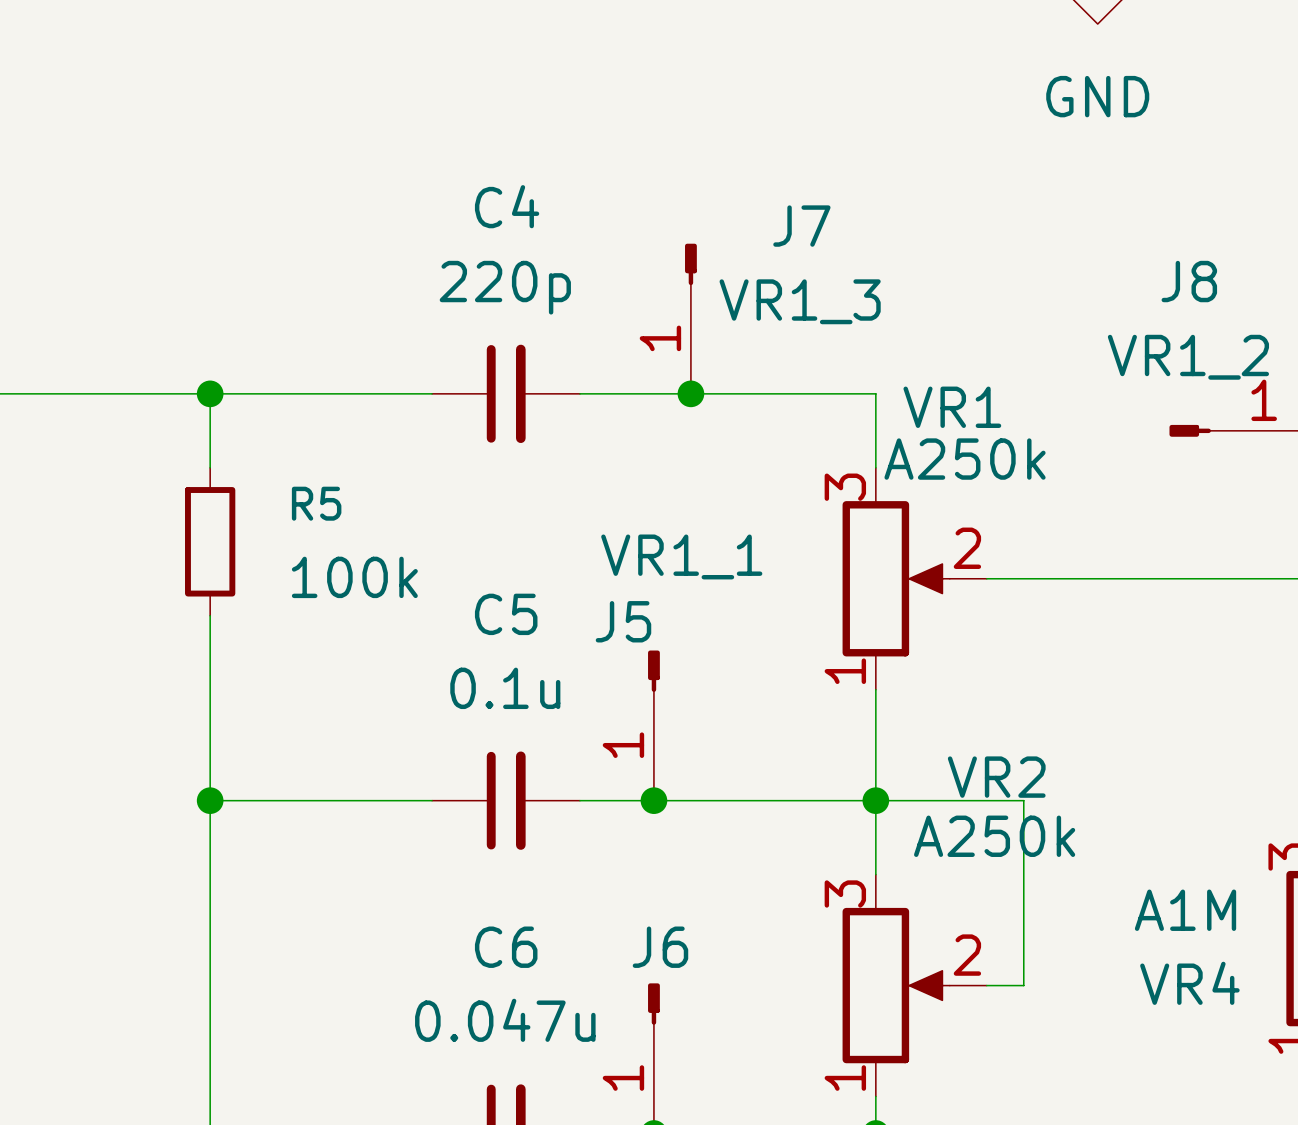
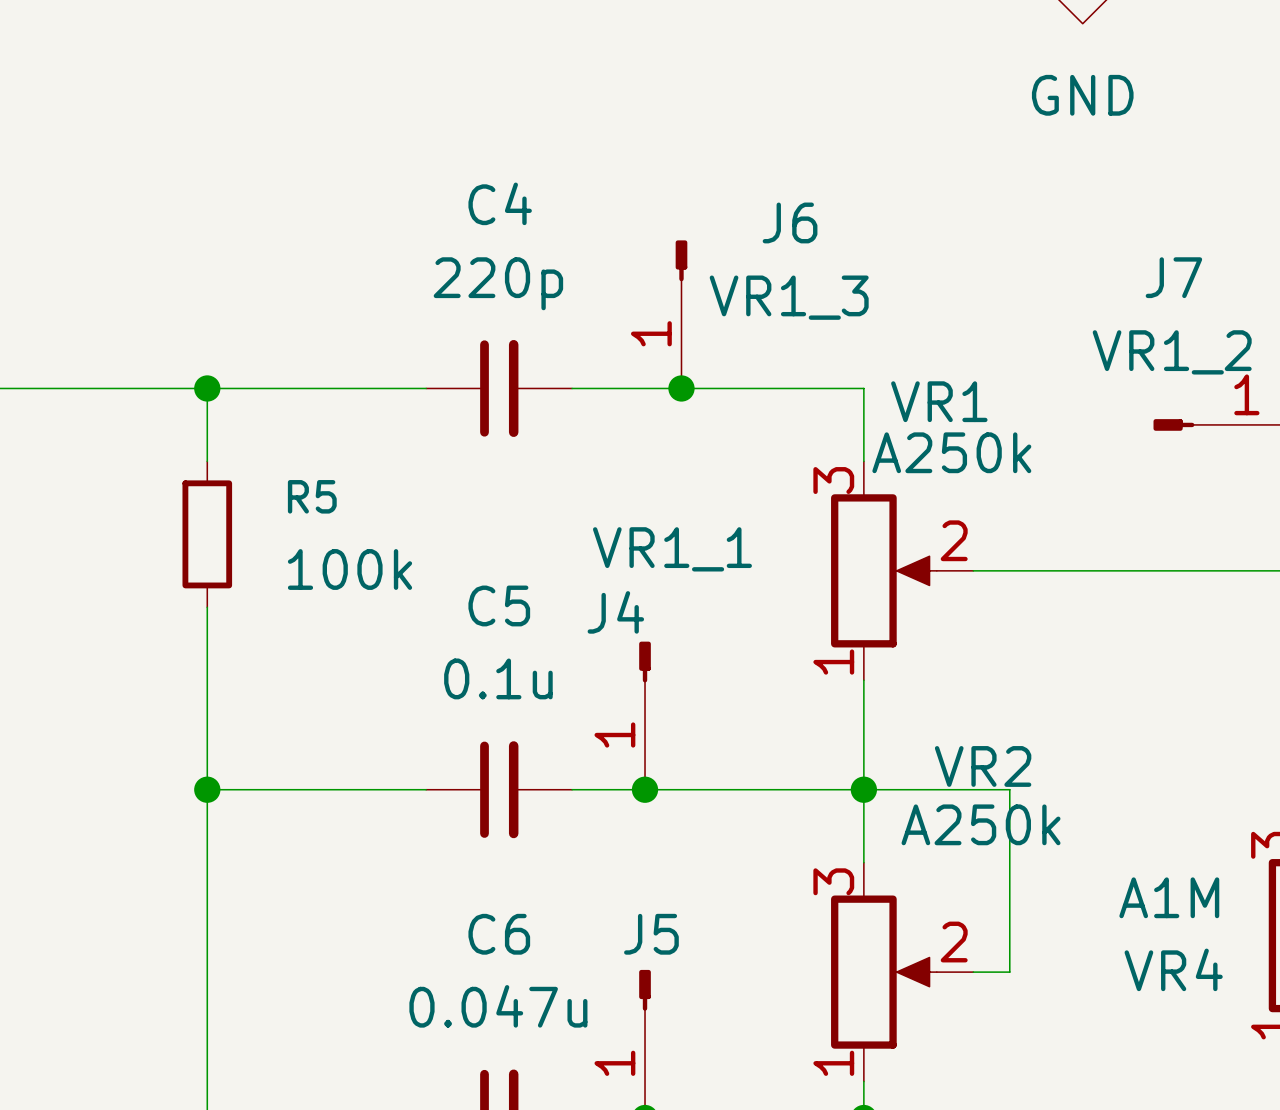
J7 name: J7 (801, 226) -> J6 (790, 222)
J8 name: J8 (1189, 281) -> J7 (1173, 277)
J5 name: J5 (623, 621) -> J4 (615, 612)
J6 name: J6 (660, 947) -> J5 (651, 934)

